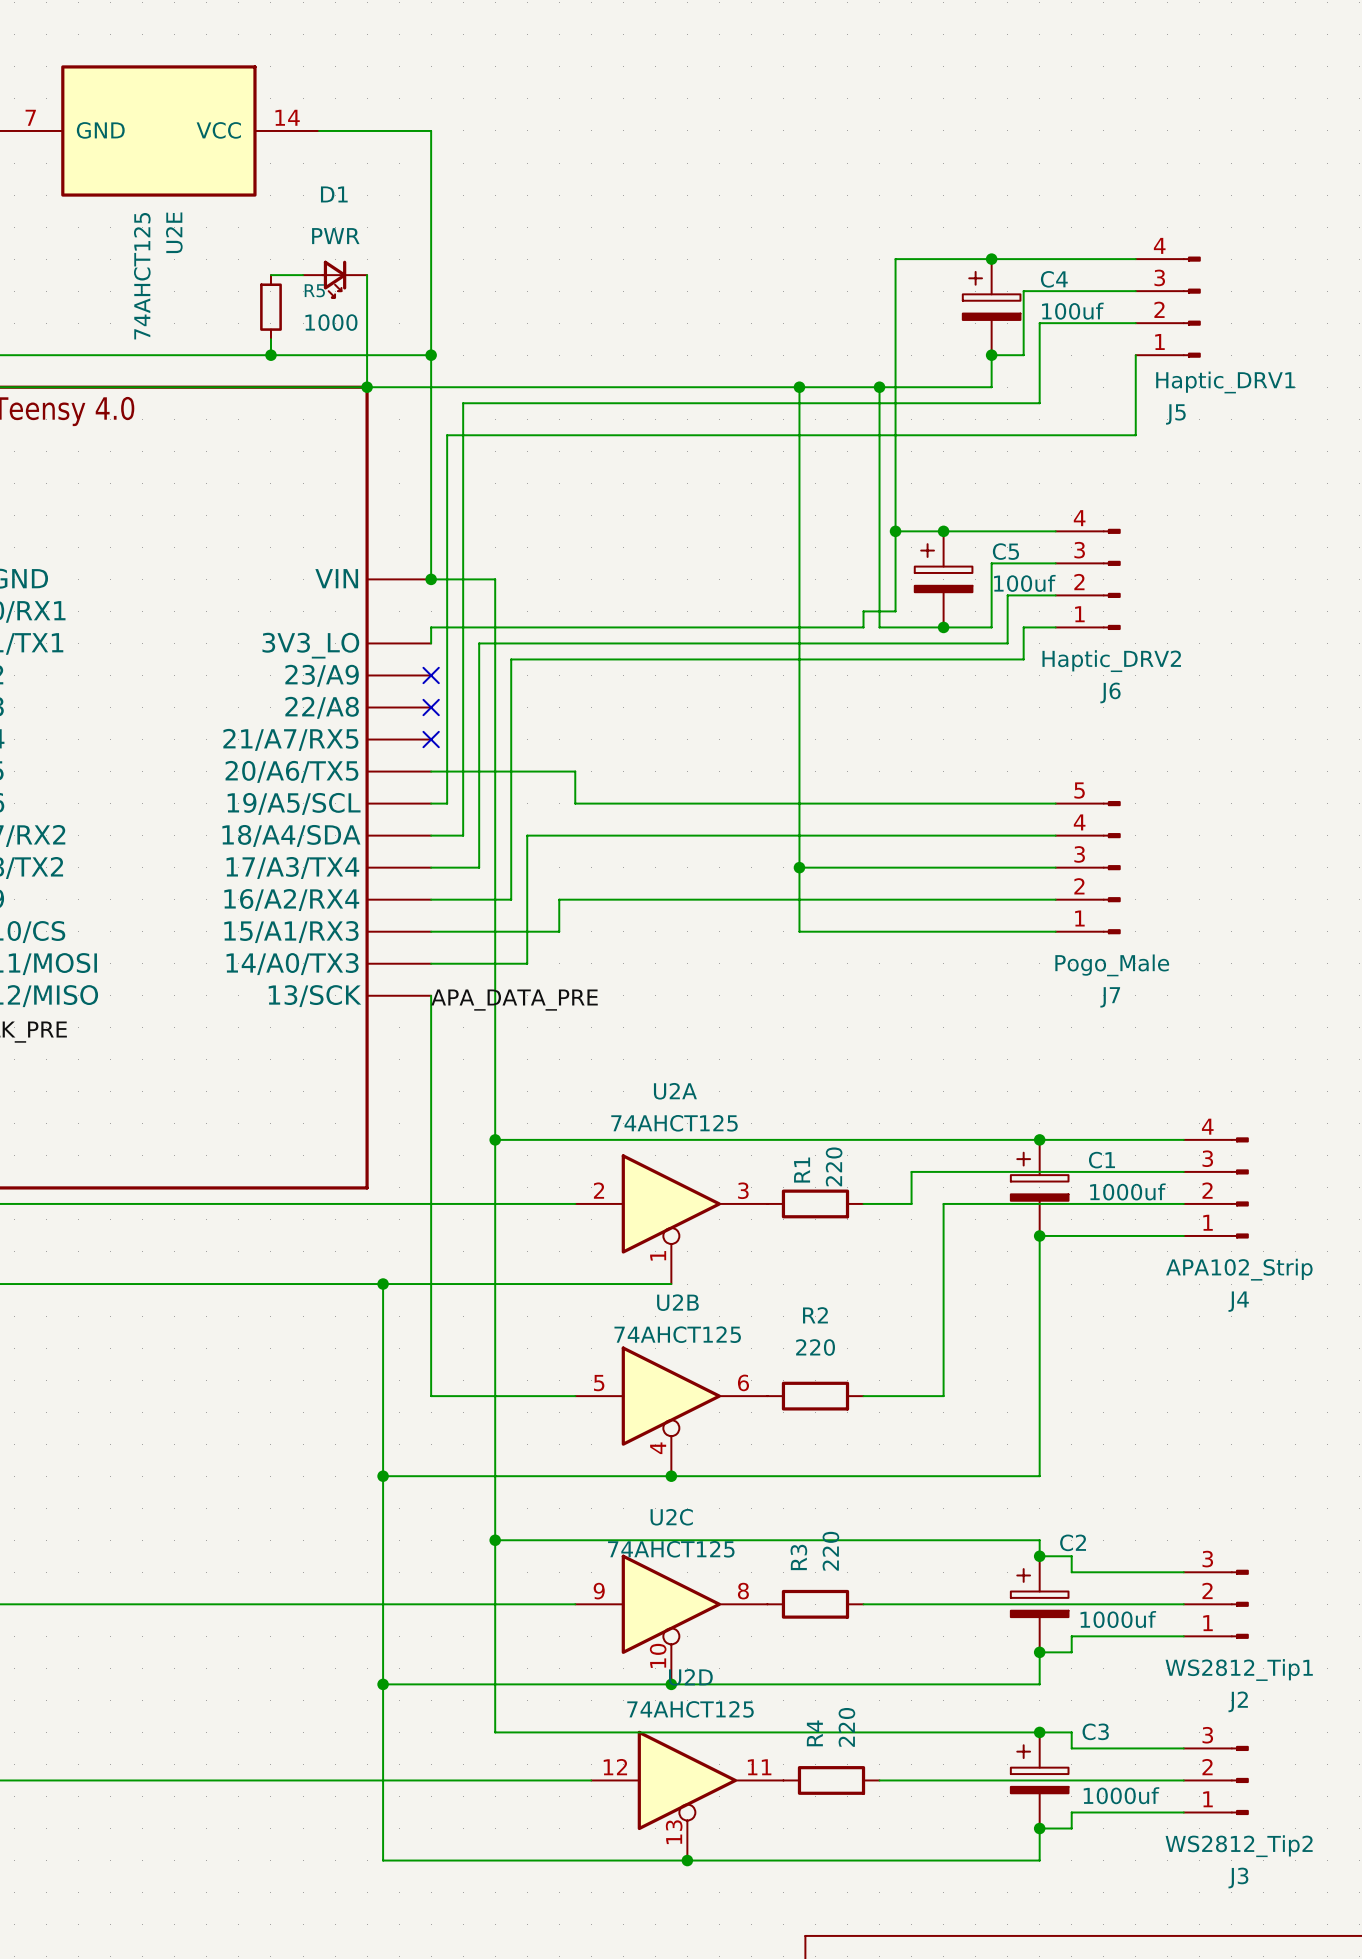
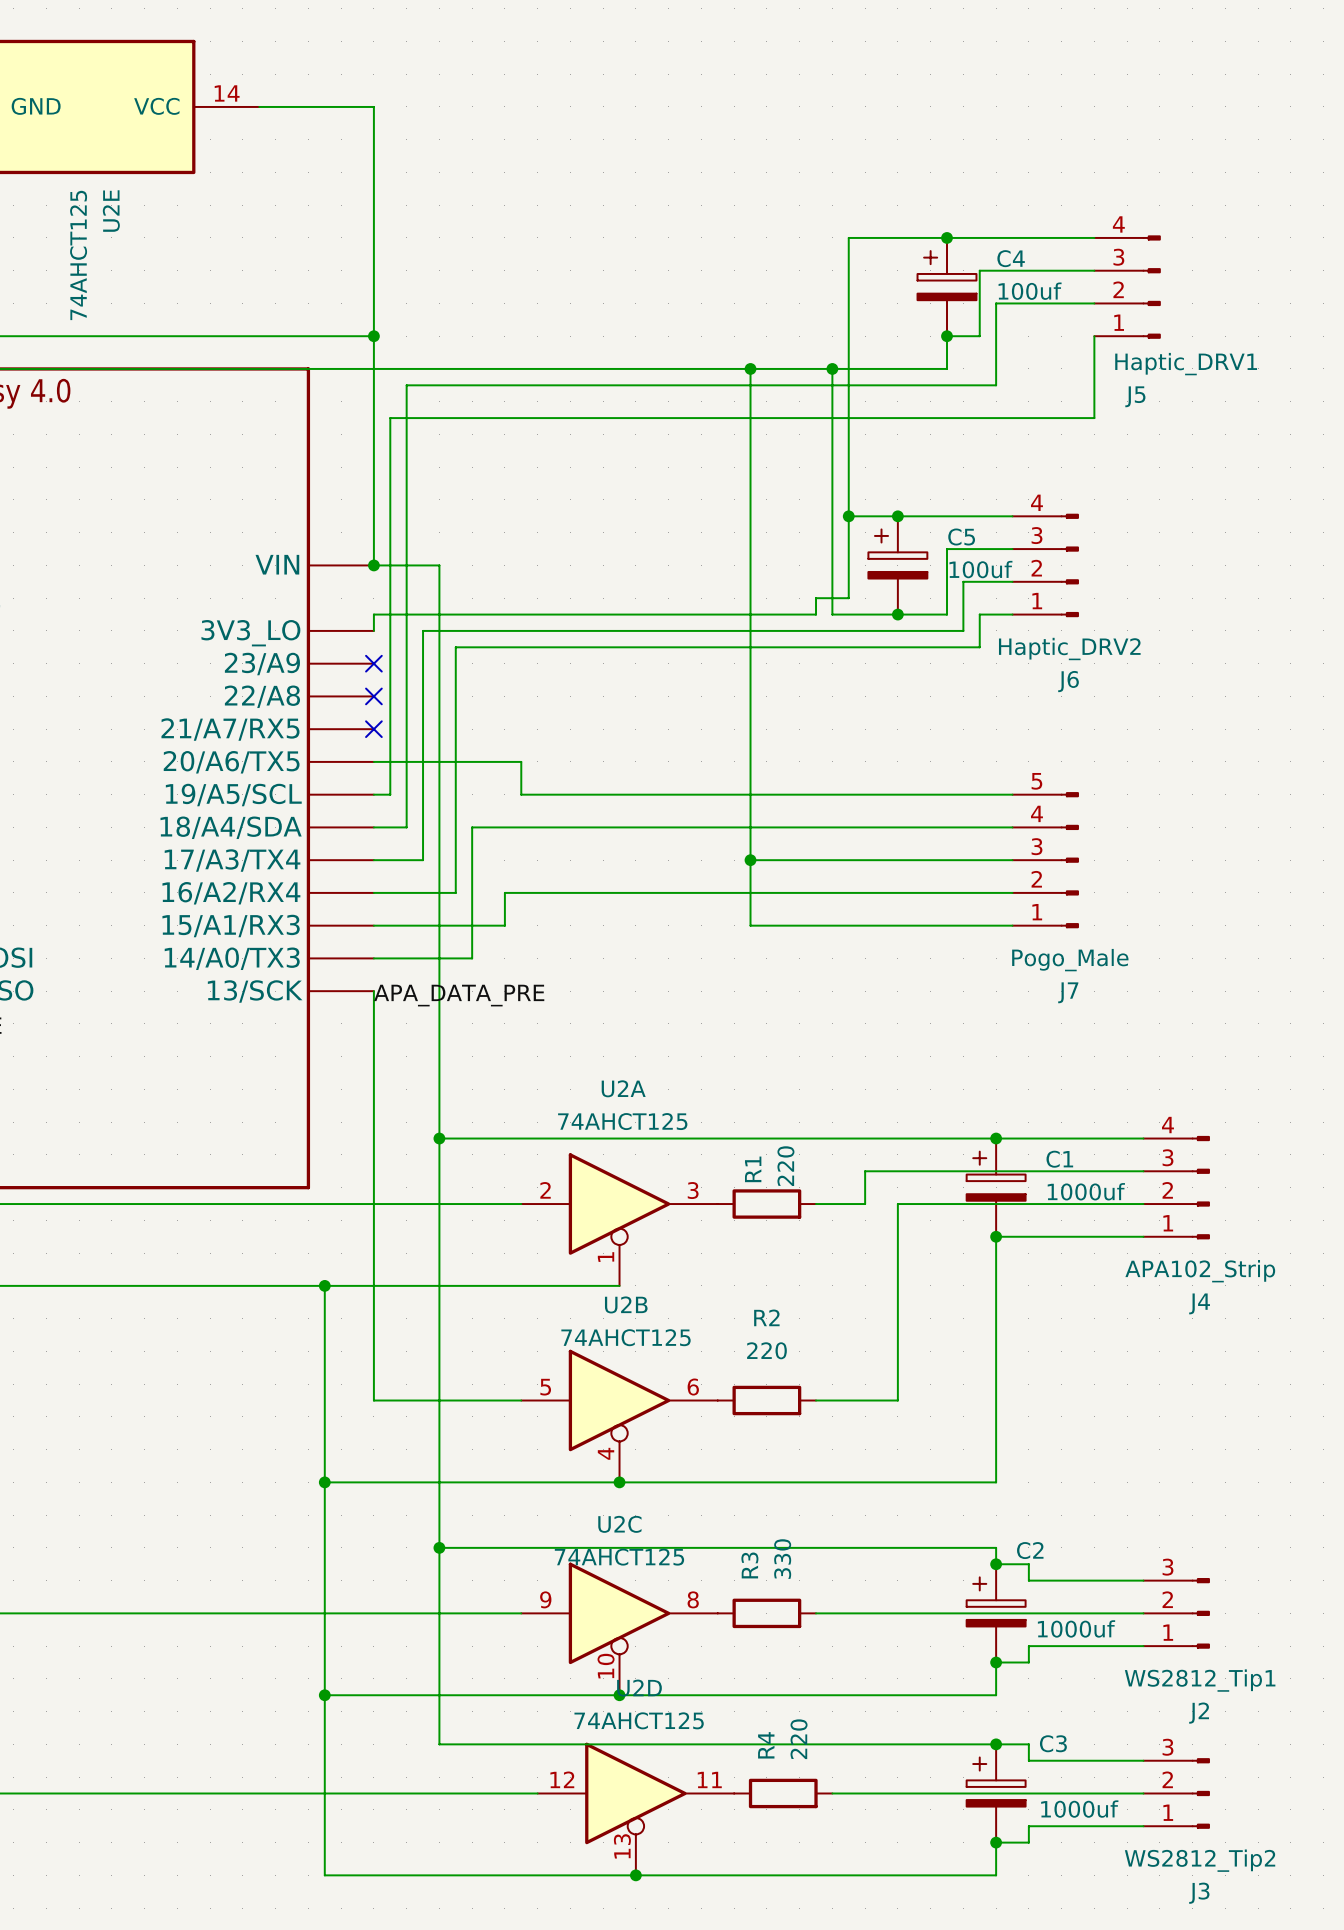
wire: (270, 275) (303, 275) -> none
wire: (367, 275) (367, 387) -> none
D1: PWR (335, 279) -> none
R5: 1000 (270, 307) -> none
wire: (270, 339) (270, 355) -> none
junction: (270, 355) -> none
junction: (367, 387) -> none
R3 value: 220 (830, 1551) -> 330 (782, 1559)

